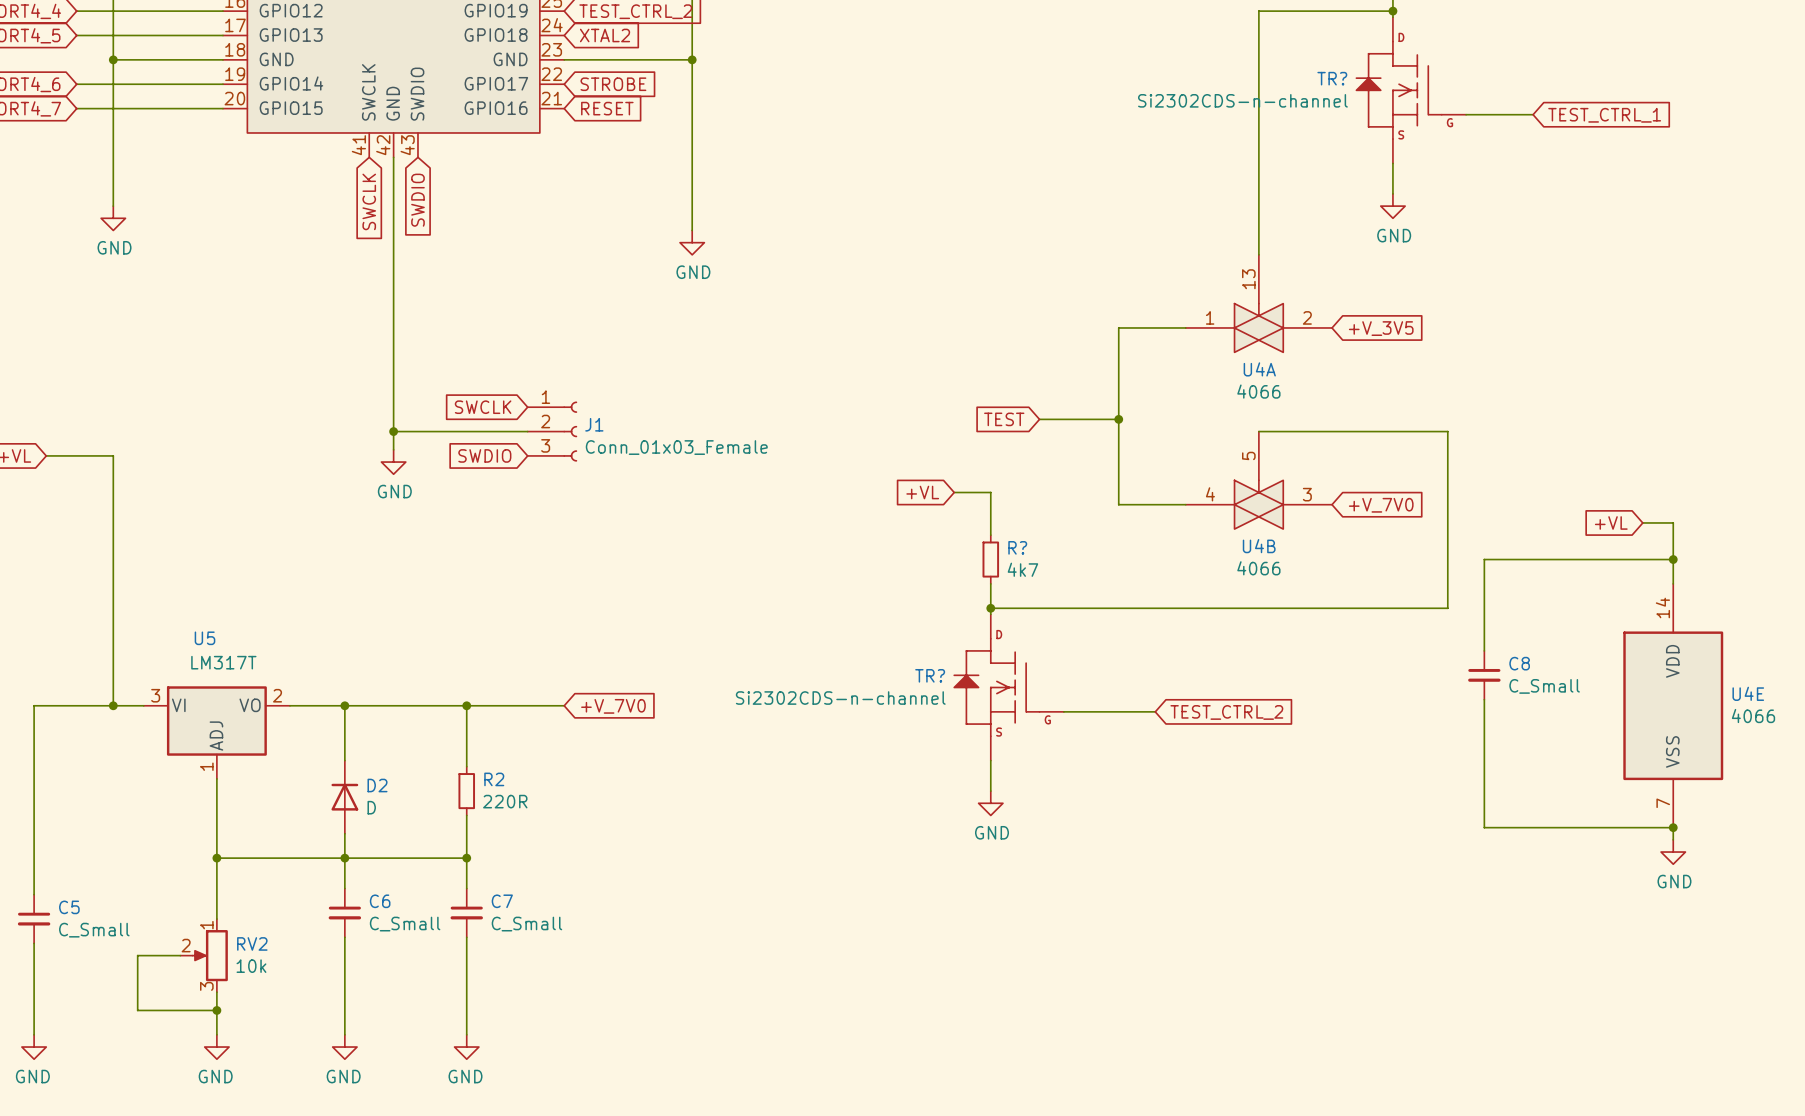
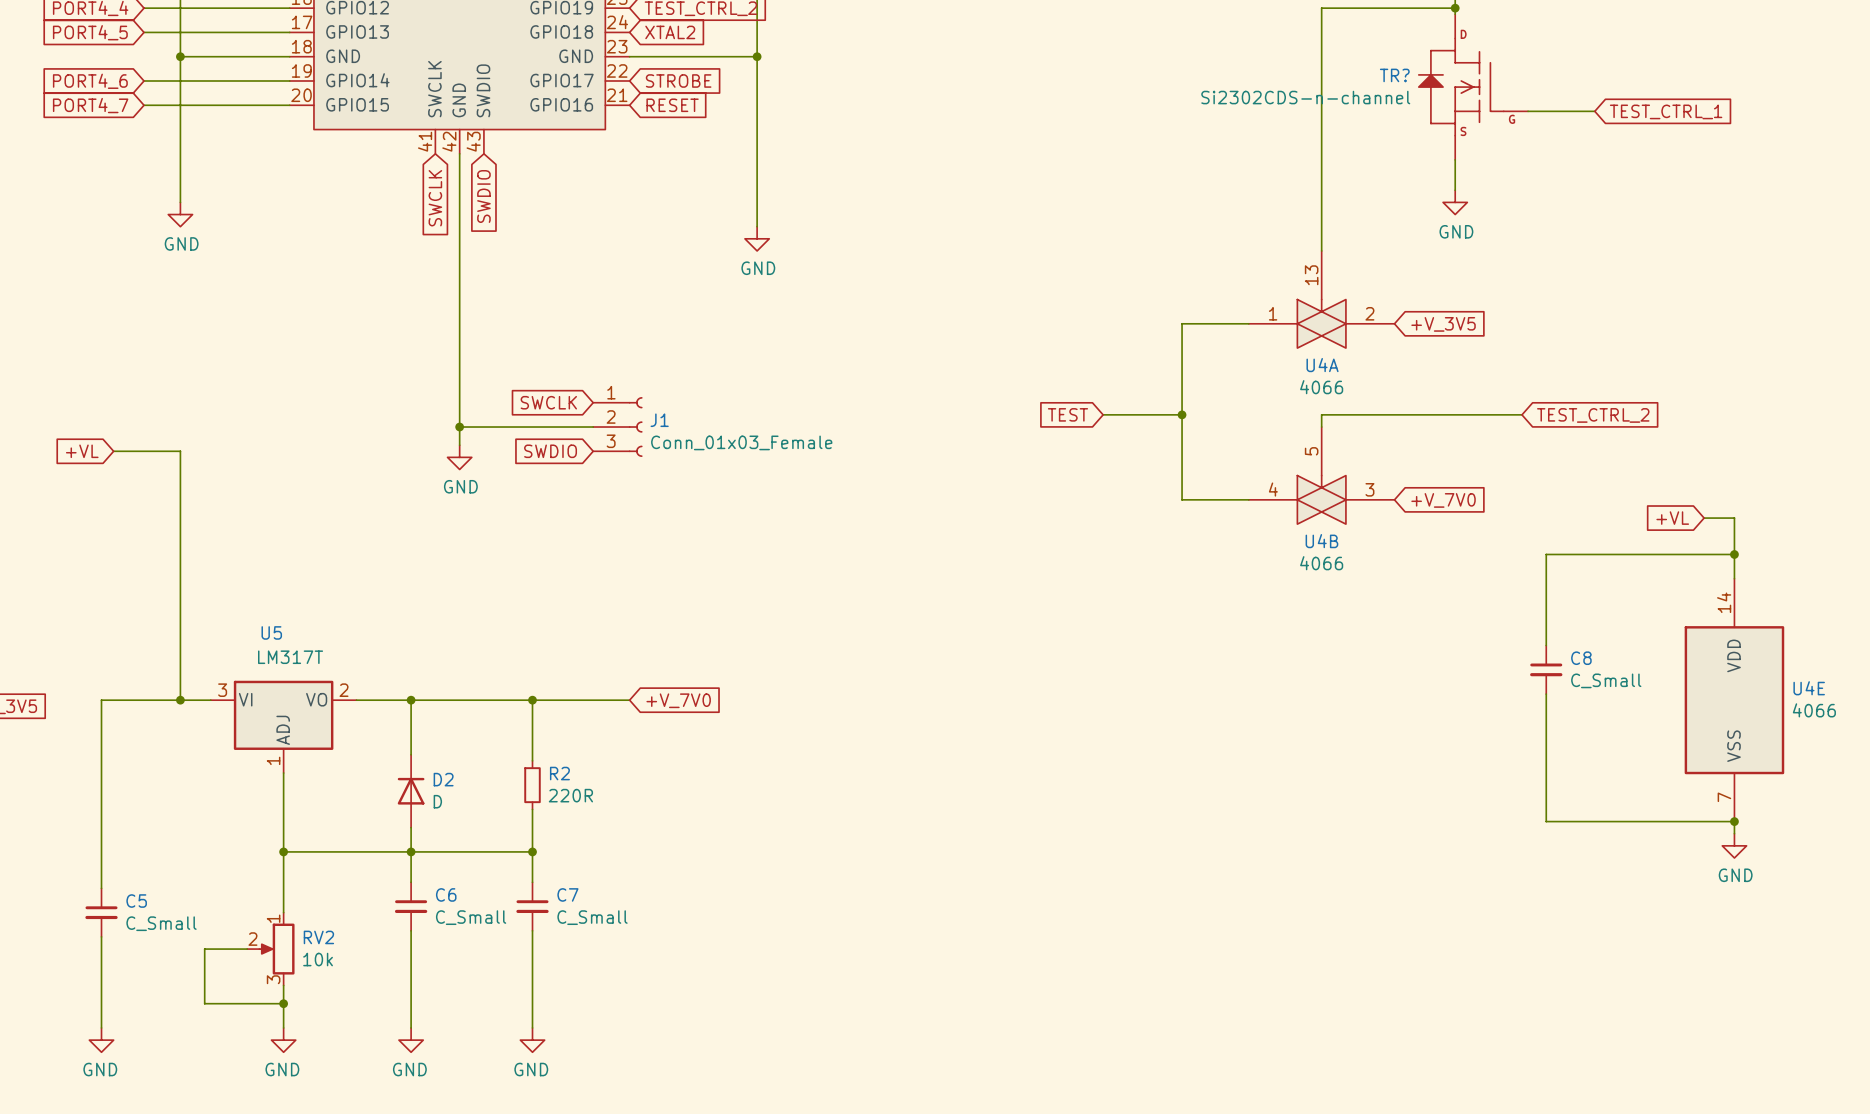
global label: none -> TEST_CTRL_2 (1593, 415)
wire: (1258, 431) (1447, 431) (1447, 608) (990, 608) -> (1321, 427) (1321, 414) (1521, 414)
global label: +VL (922, 492) -> none
wire: (954, 492) (990, 492) (990, 535) -> none
R?: 4k7 (990, 559) -> none
wire: (990, 583) (990, 614) -> none
junction: (990, 608) -> none
TR?: Si2302CDS-n-channel (1009, 687) -> none
wire: (1063, 711) (1155, 711) -> none
global label: TEST_CTRL_2 (1226, 712) -> none
wire: (990, 760) (990, 791) -> none
power symbol: GND (990, 803) -> none

